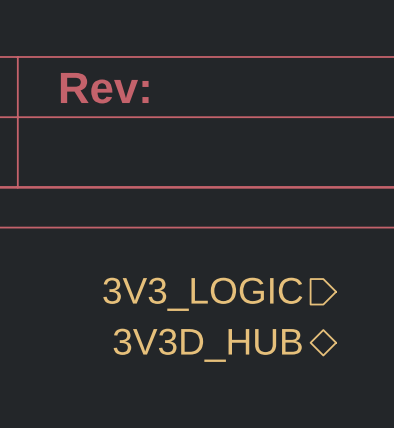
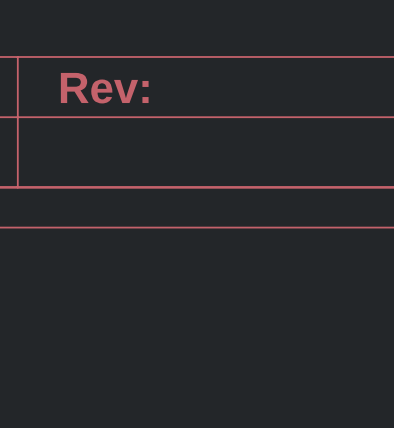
hierarchical label: 3V3_LOGIC (202, 294) -> none
hierarchical label: 3V3D_HUB (207, 345) -> none

